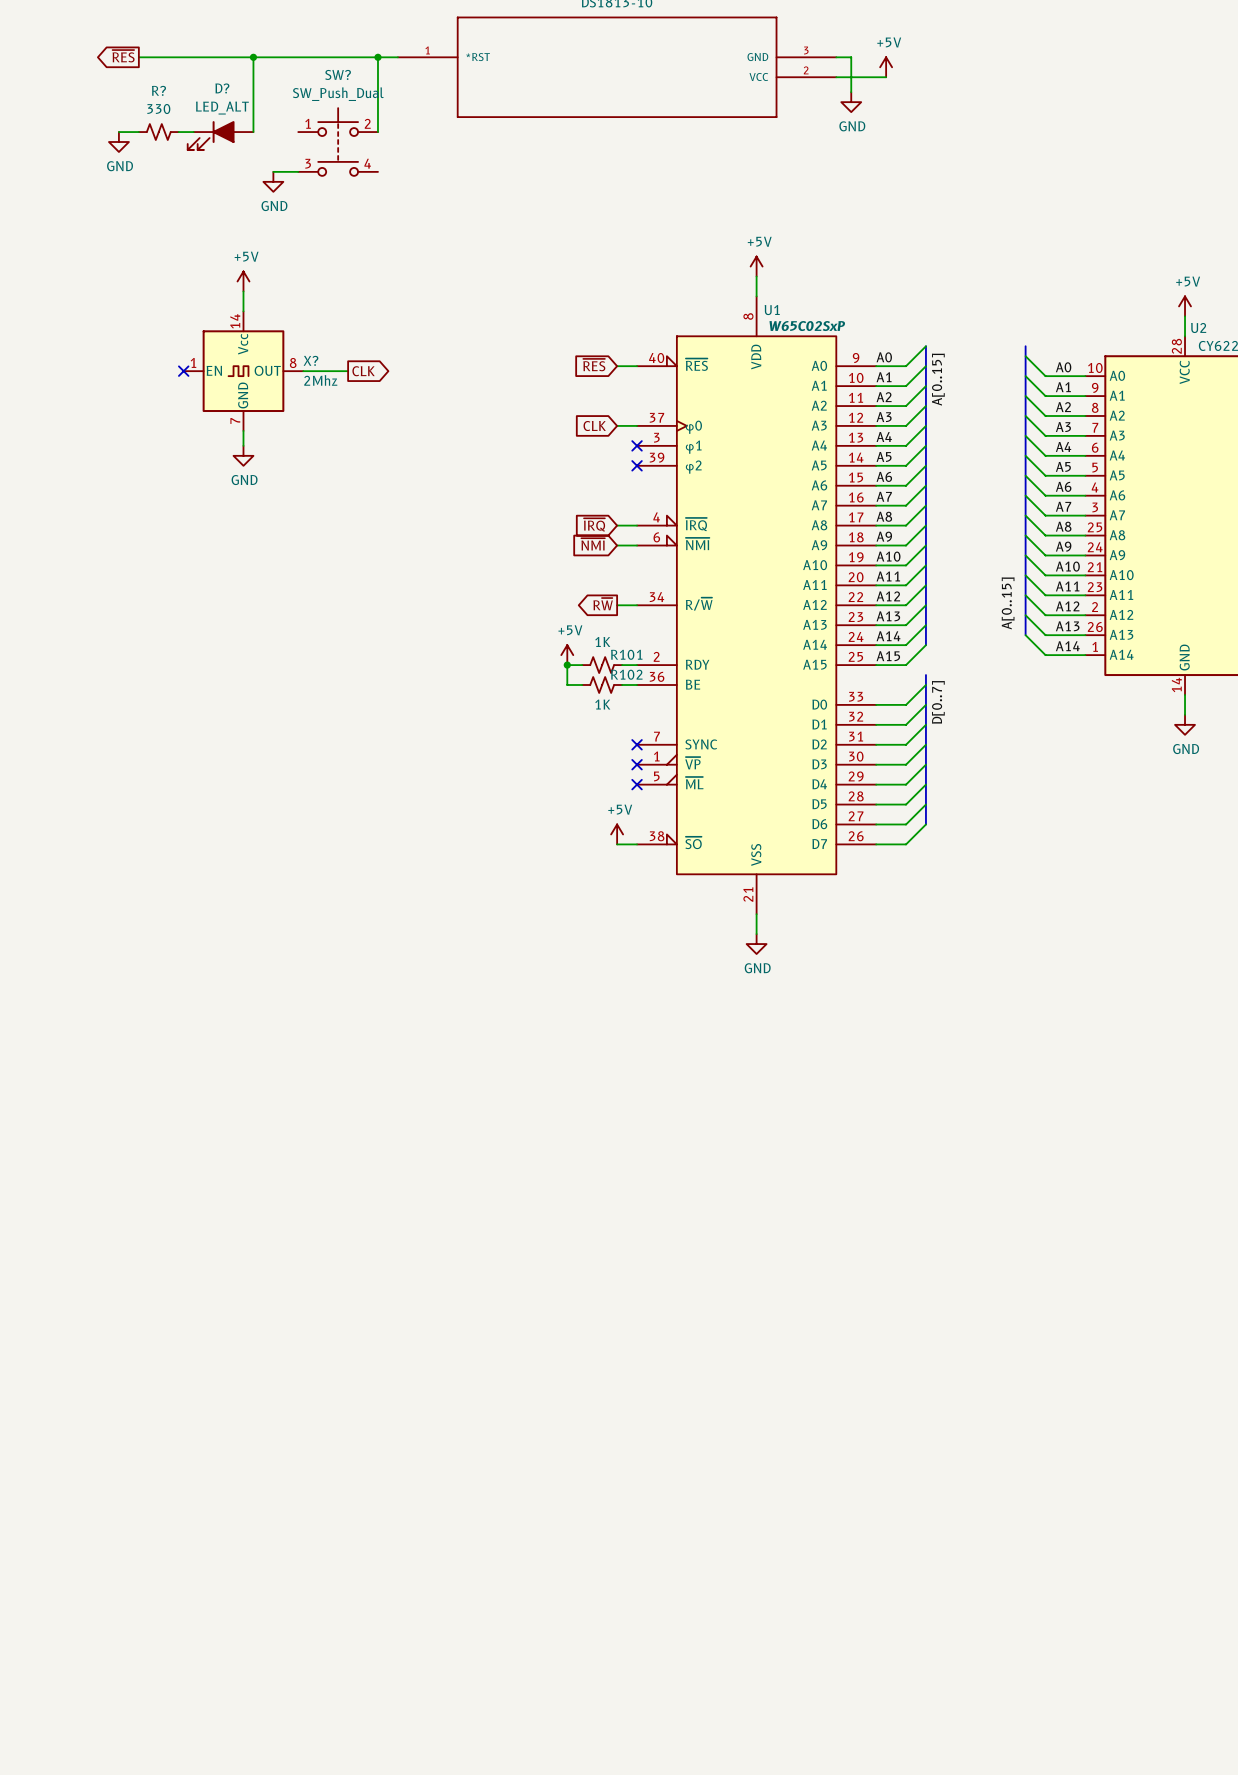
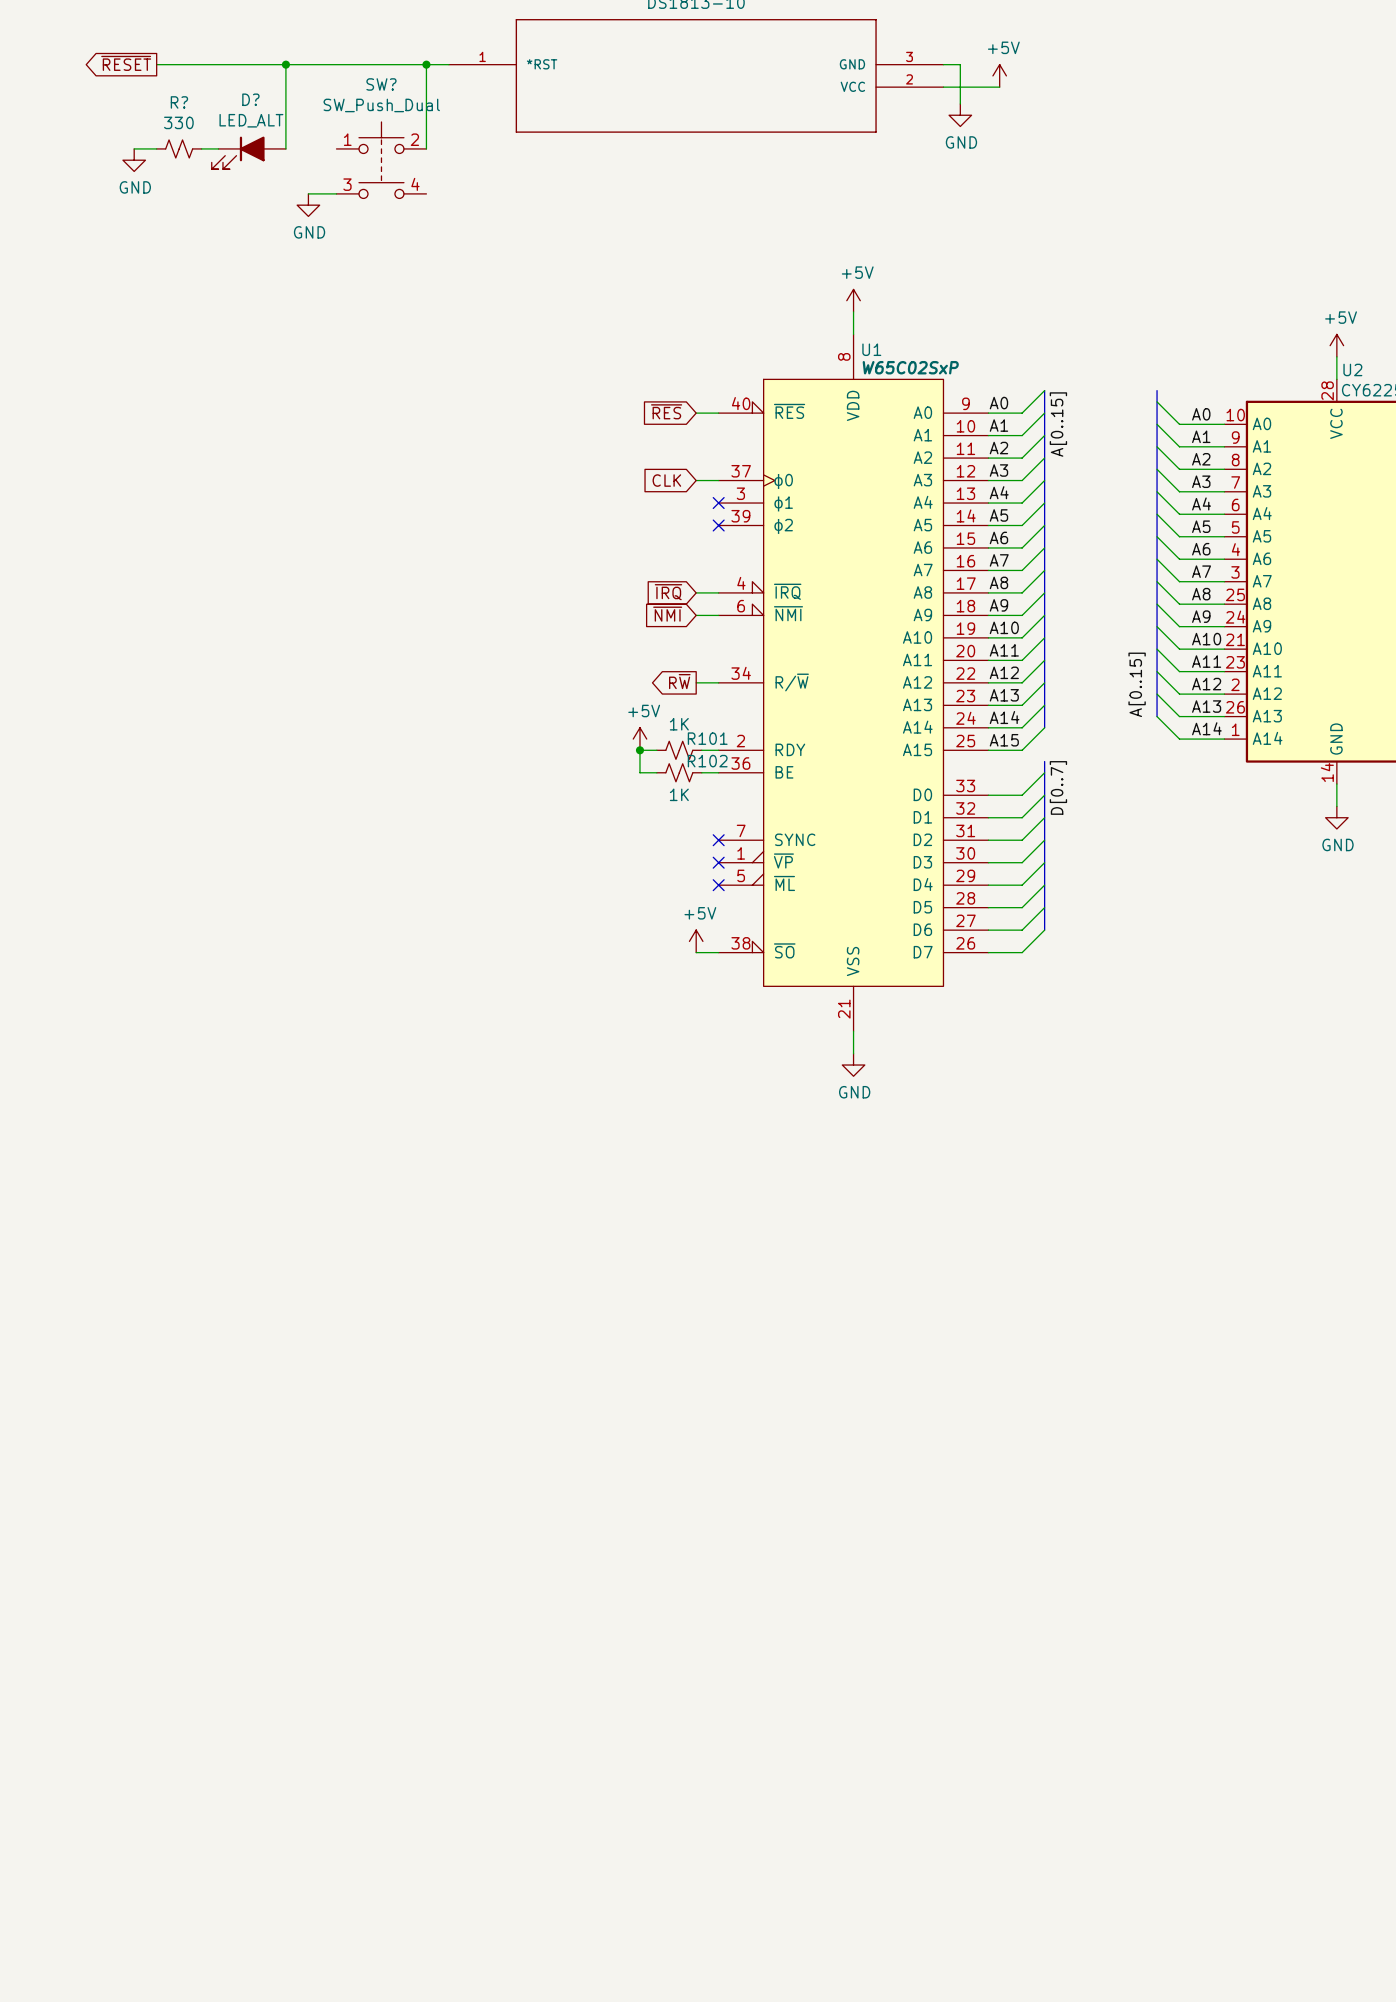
global label: ~{RES} (123, 56) -> ~{RESET} (126, 63)
power symbol: +5V (243, 281) -> none
wire: (243, 291) (243, 311) -> none
no-connect mark: (183, 371) -> none
X?: 2Mhz (243, 371) -> none
wire: (303, 371) (348, 371) -> none
global label: CLK (363, 371) -> none
wire: (243, 430) (243, 445) -> none
power symbol: GND (243, 455) -> none

